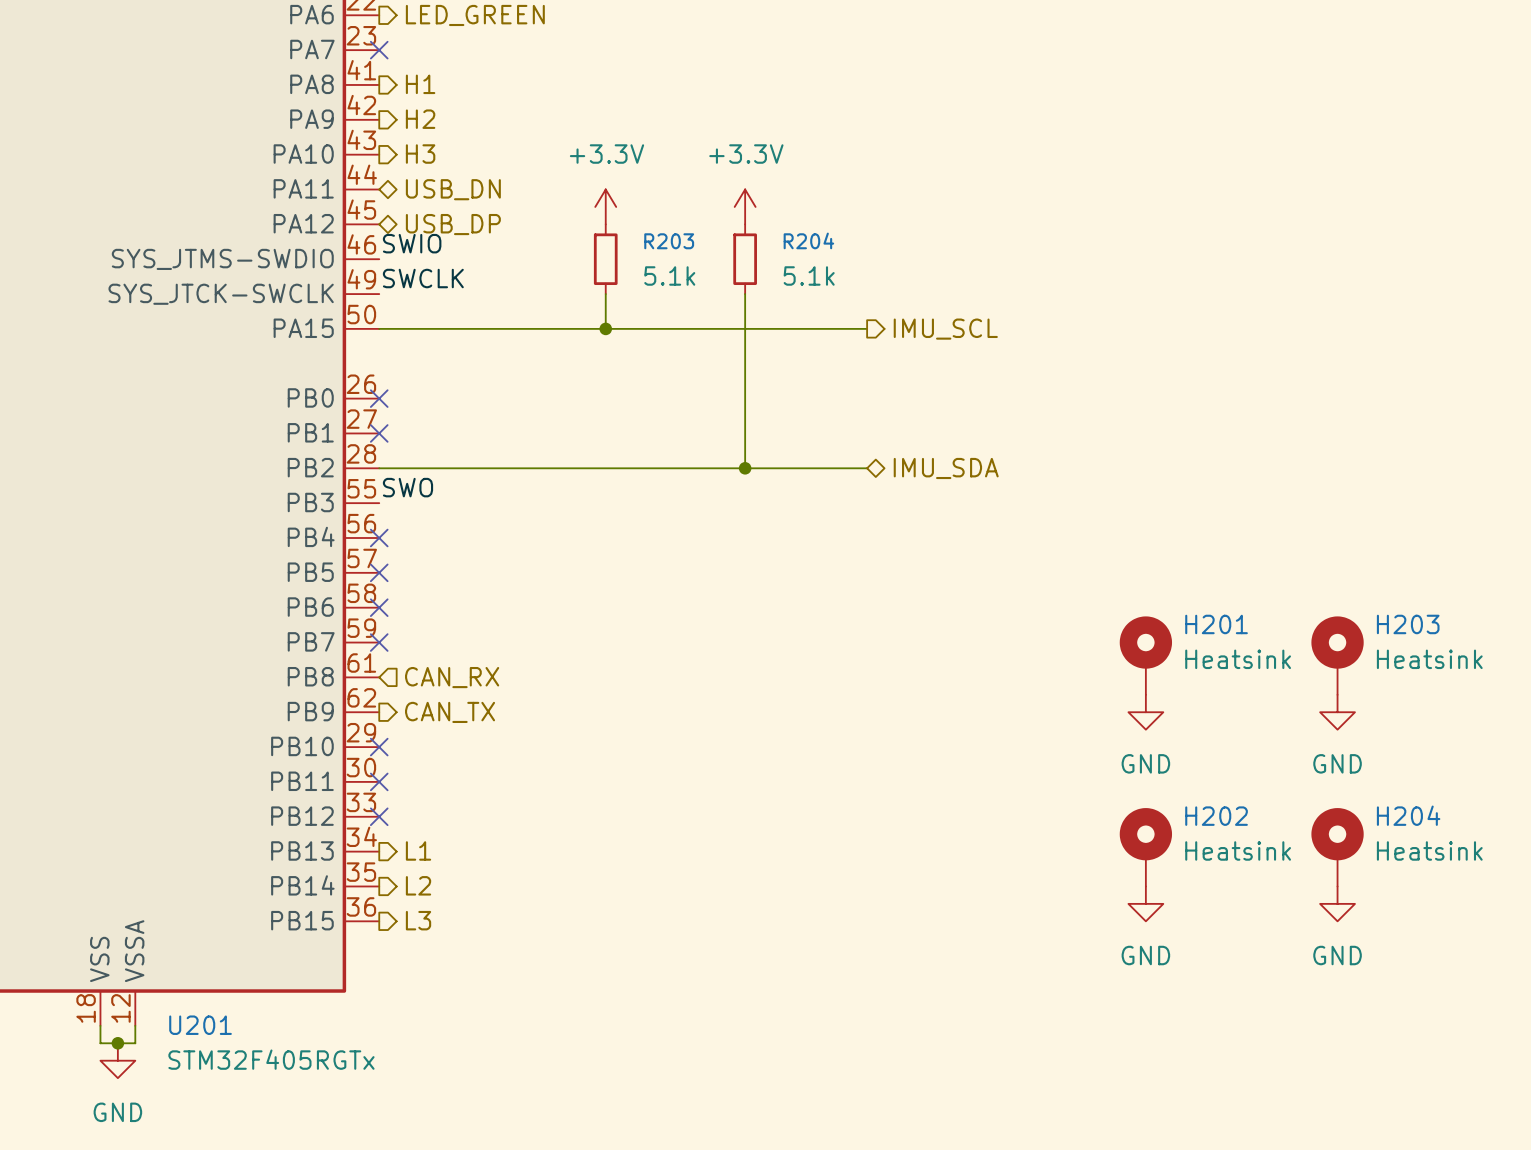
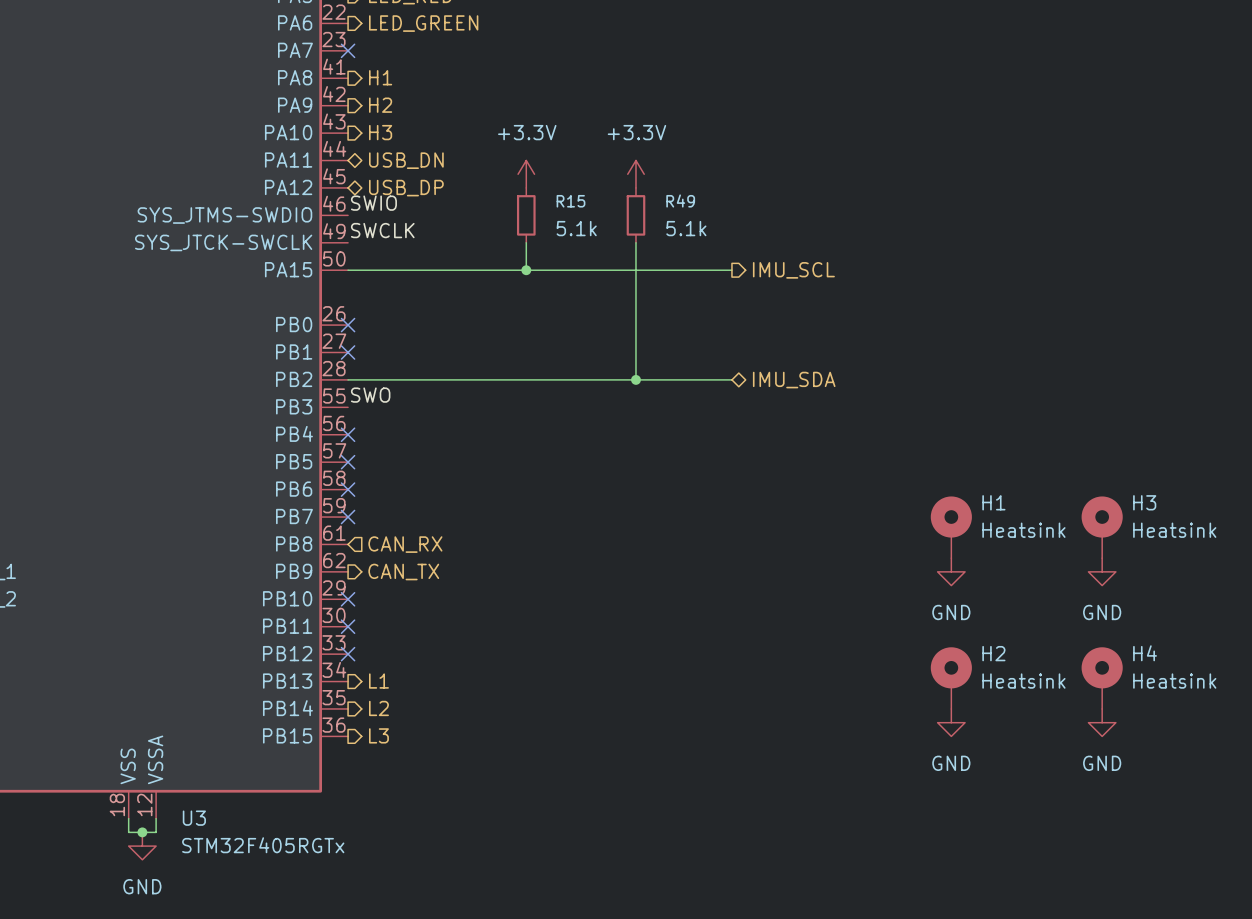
R204 name: R204 (808, 240) -> R49 (680, 200)
R203 name: R203 (669, 241) -> R15 (570, 201)
H201 name: H201 (1216, 624) -> H1 (993, 502)
H203 name: H203 (1408, 624) -> H3 (1144, 502)
H204 name: H204 (1408, 815) -> H4 (1145, 653)
H202 name: H202 (1216, 816) -> H2 (993, 653)
U201 name: U201 (200, 1025) -> U3 (194, 818)

